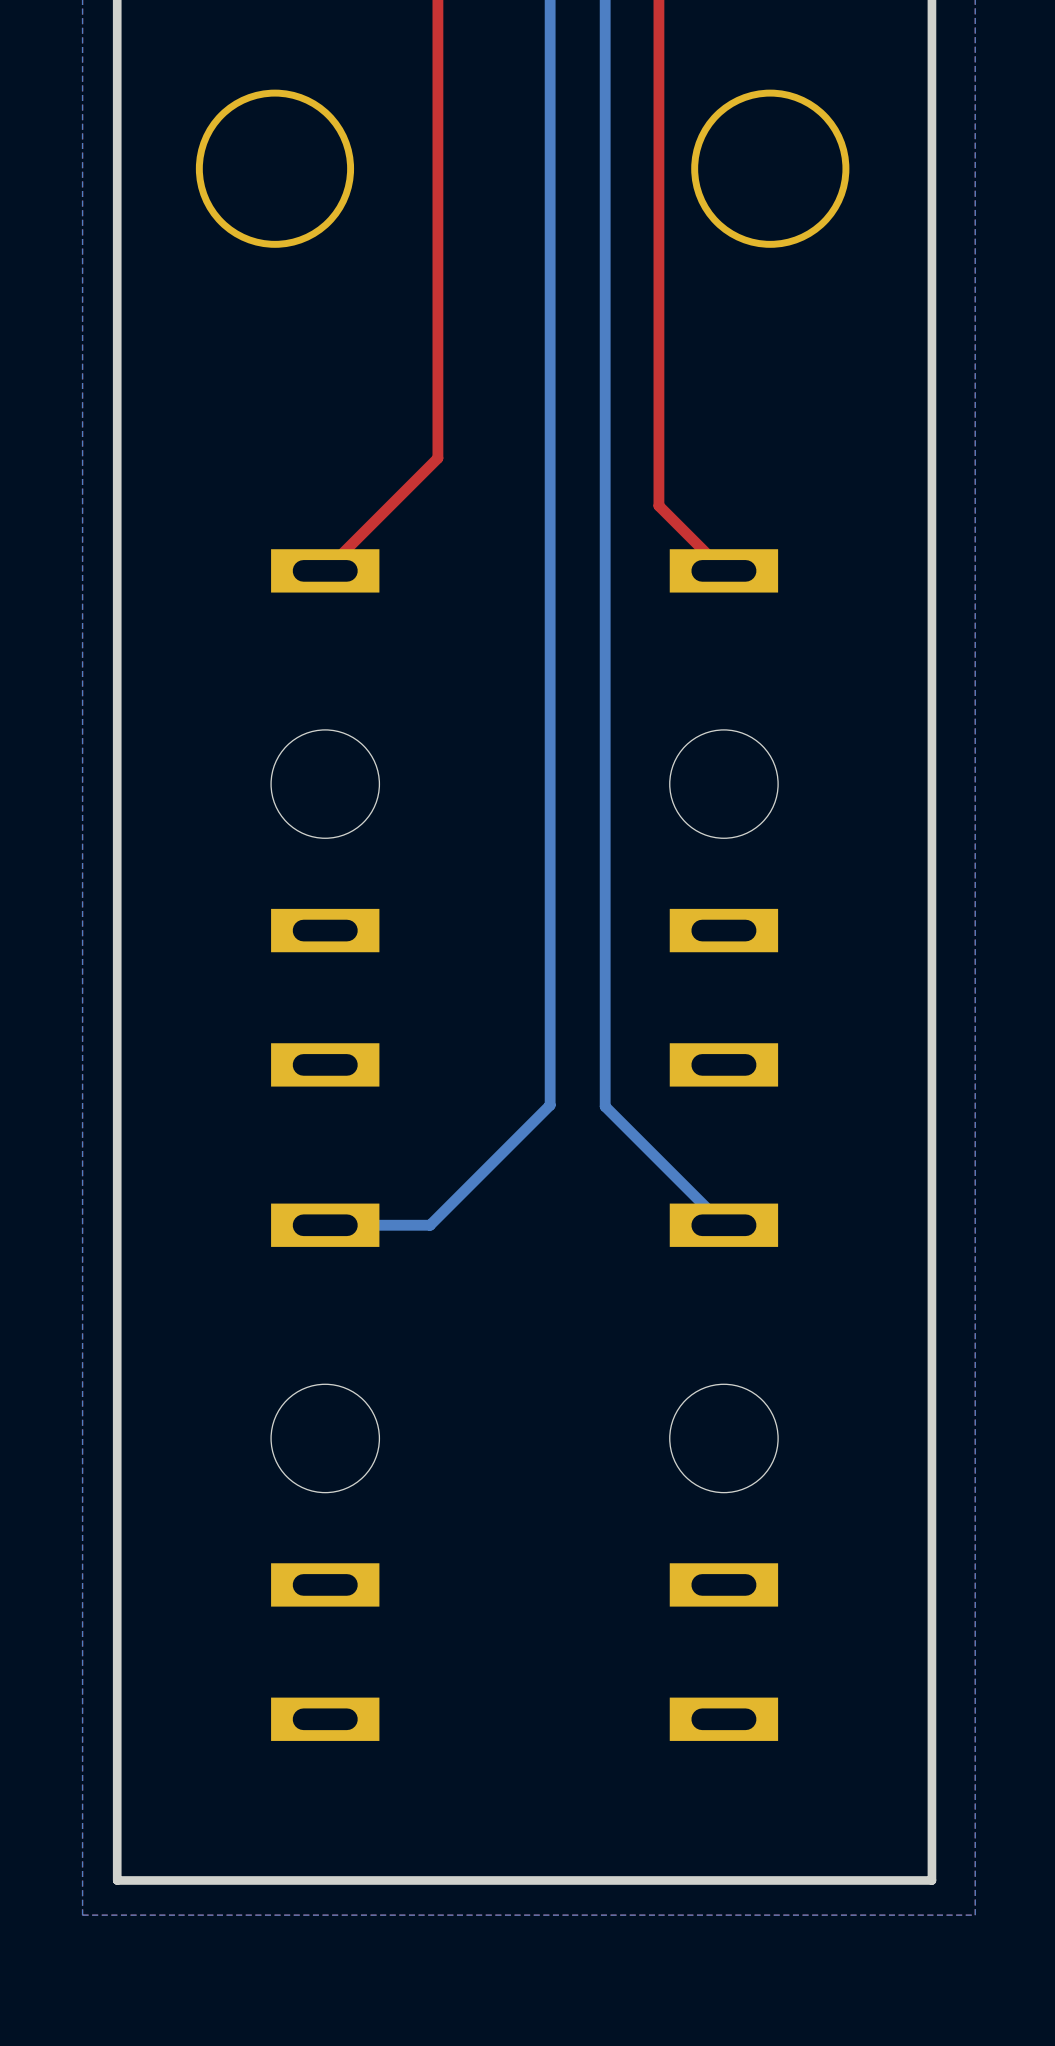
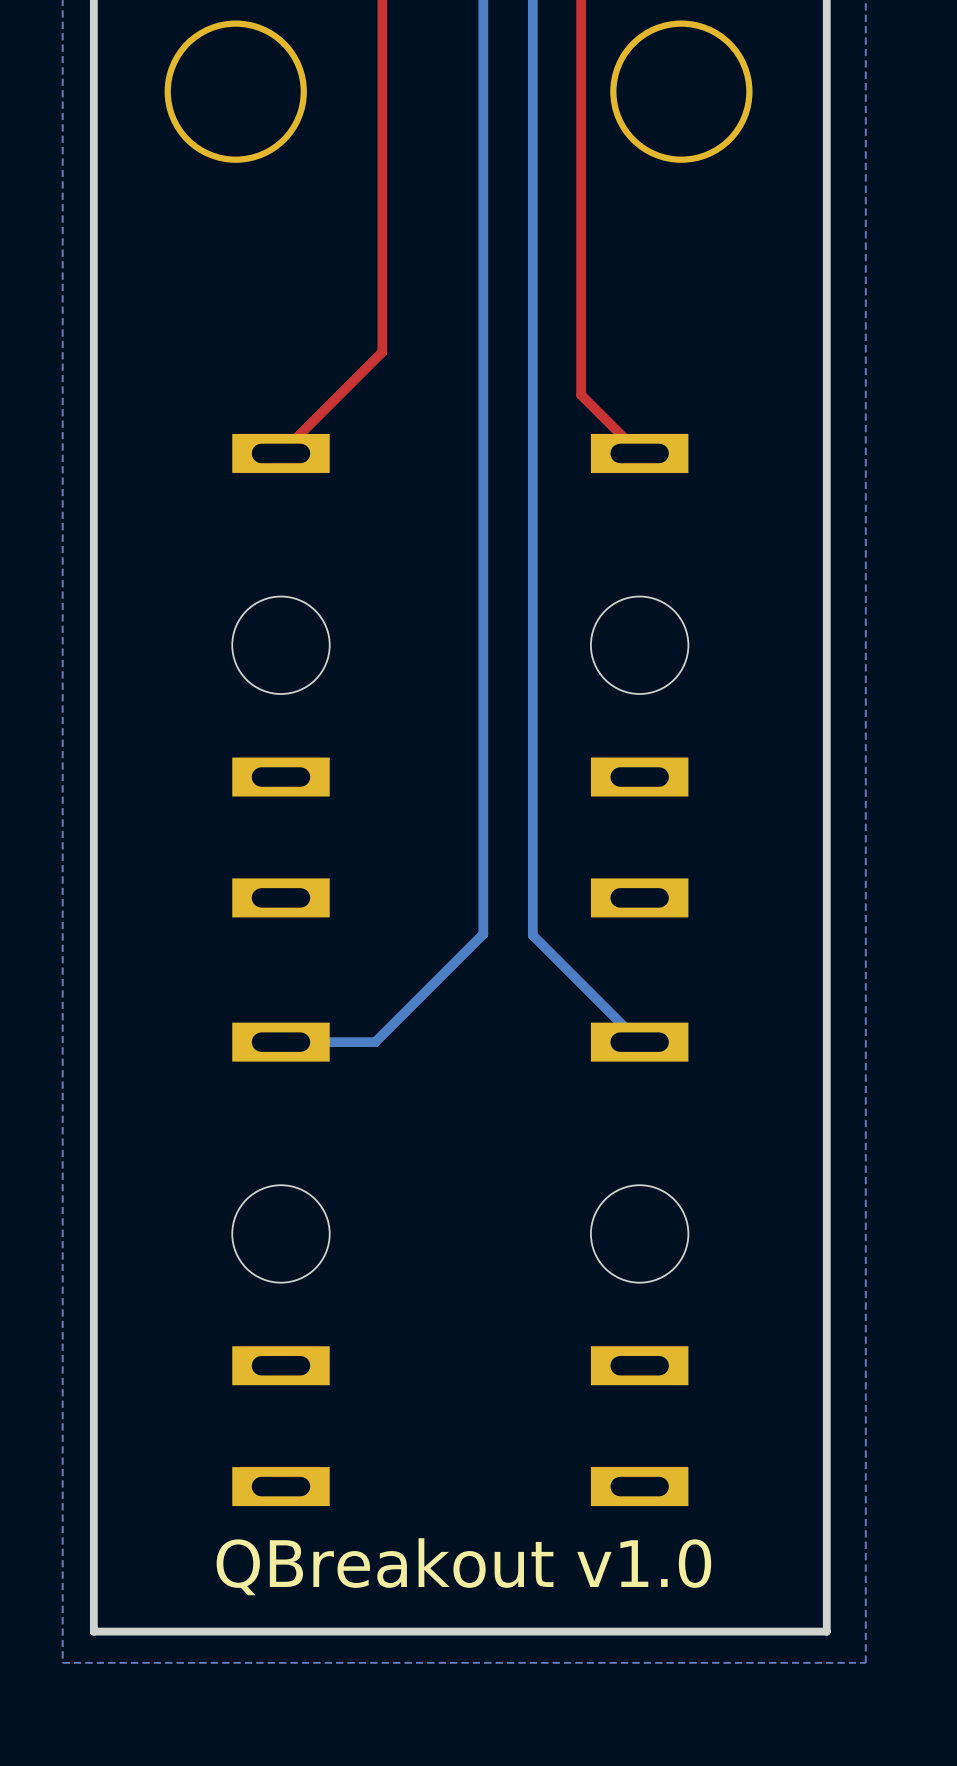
text: none -> QBreakout v1.0 (463, 1566)

